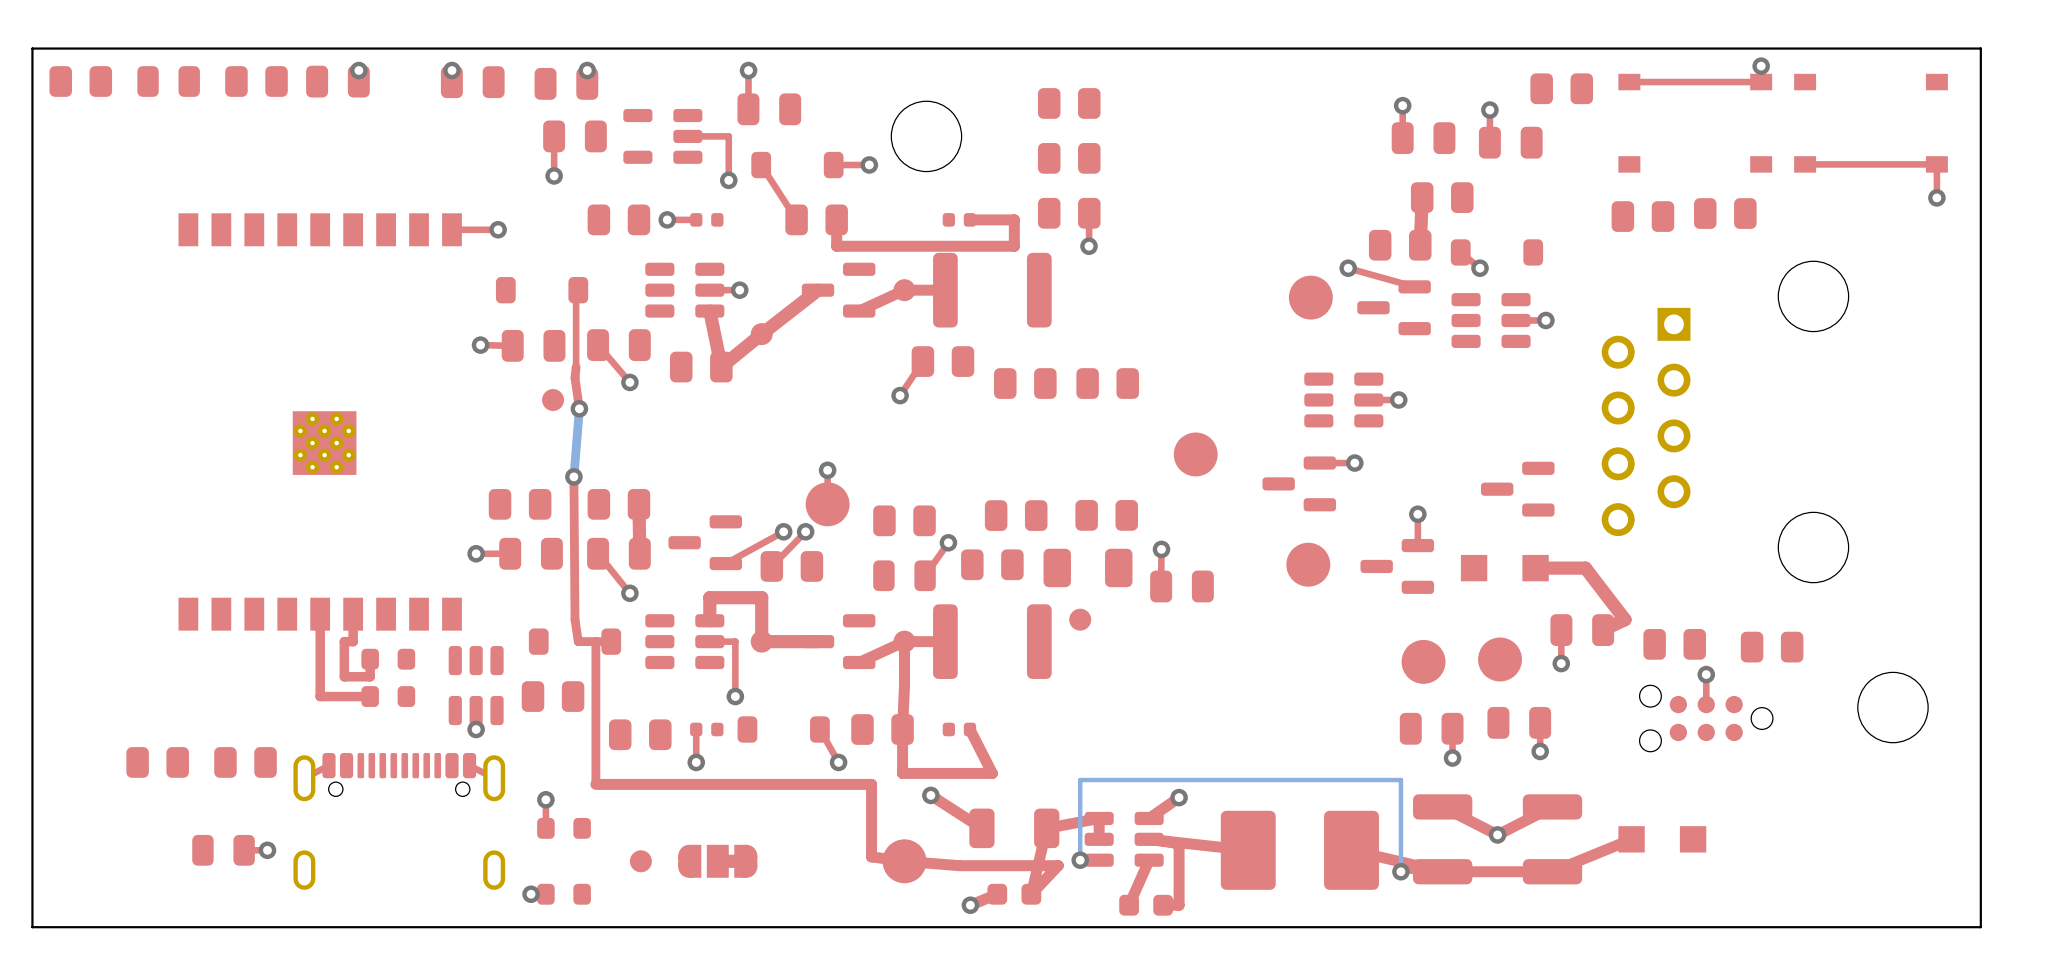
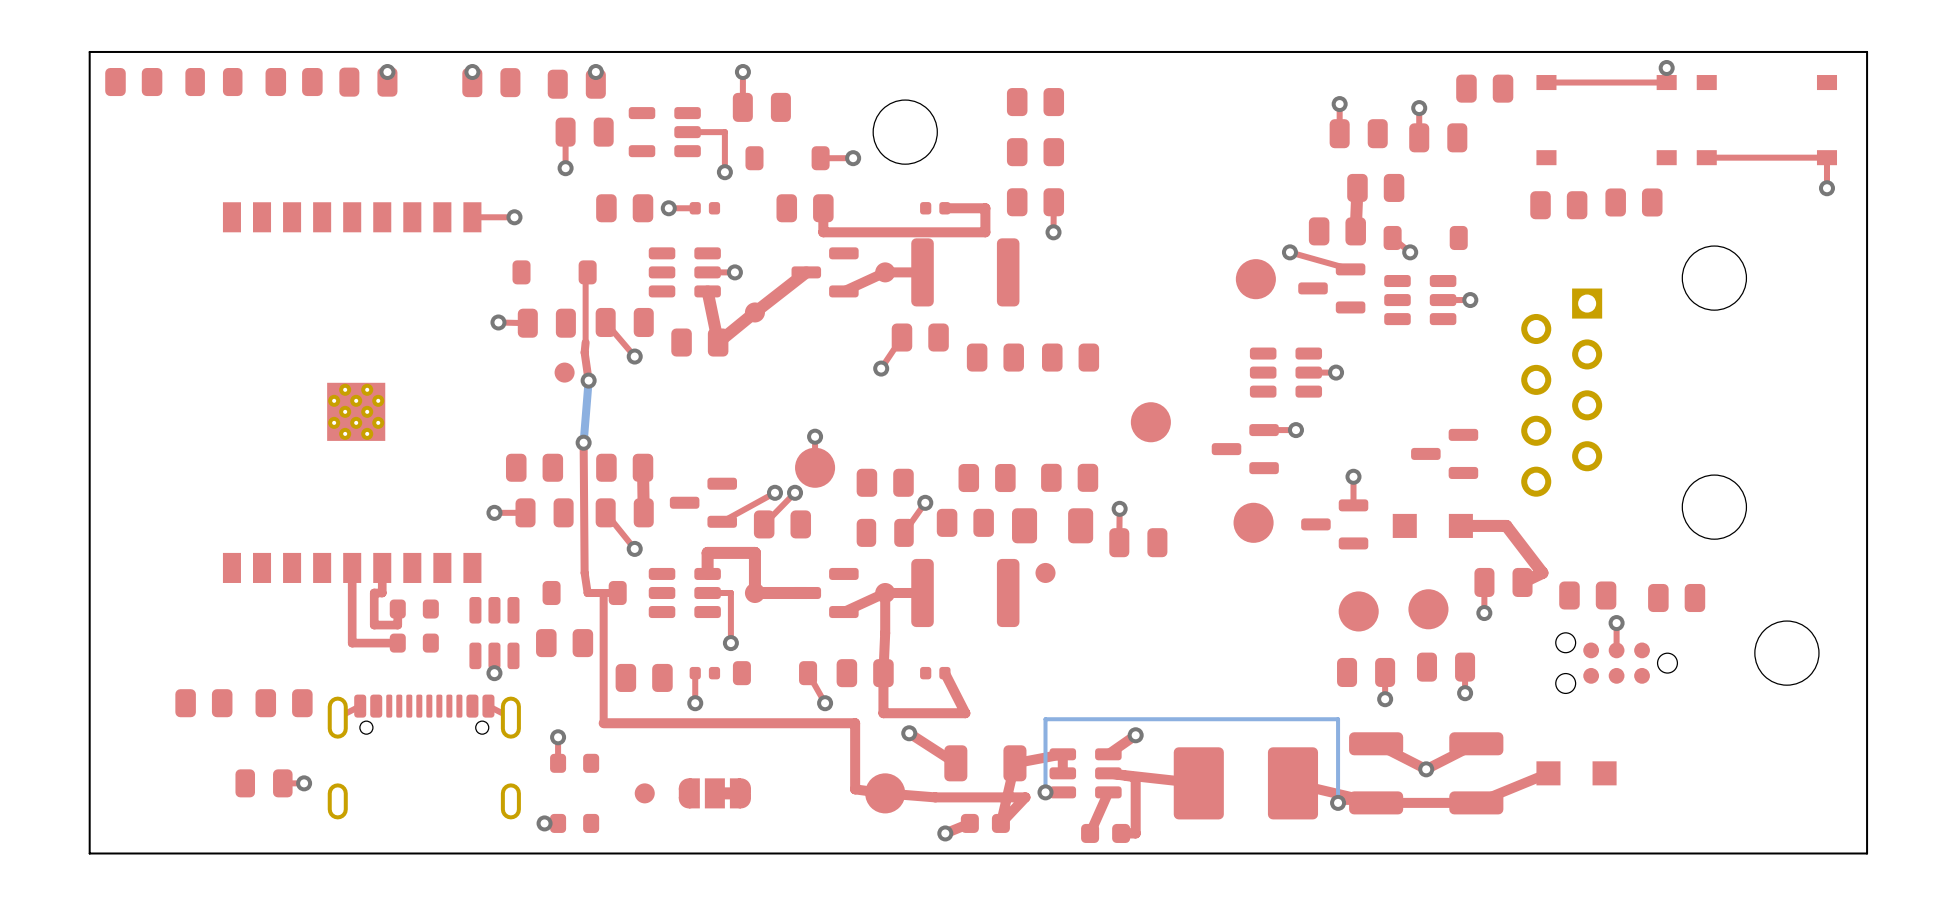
top track: (761, 165) (796, 219) -> none

